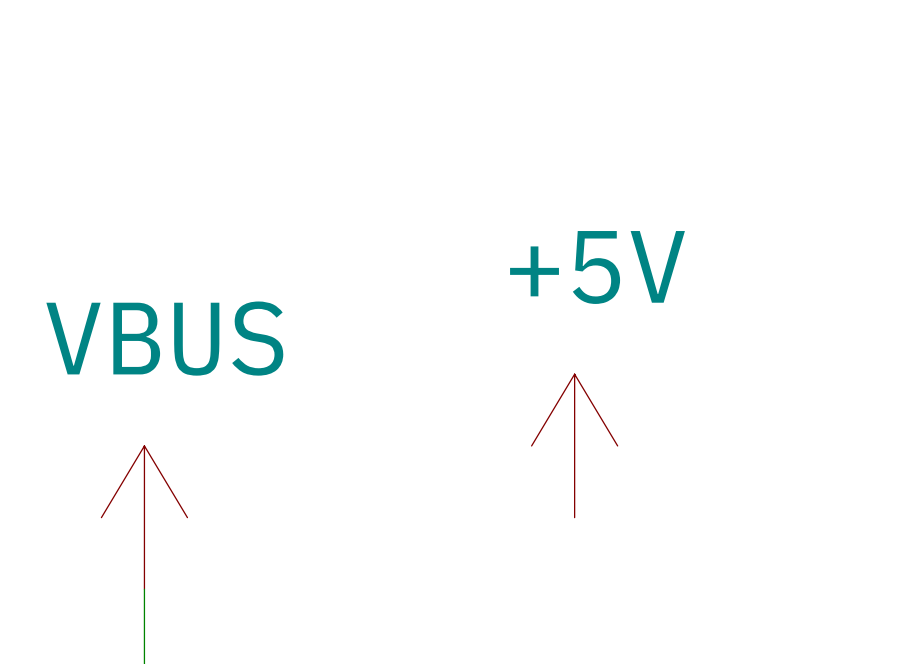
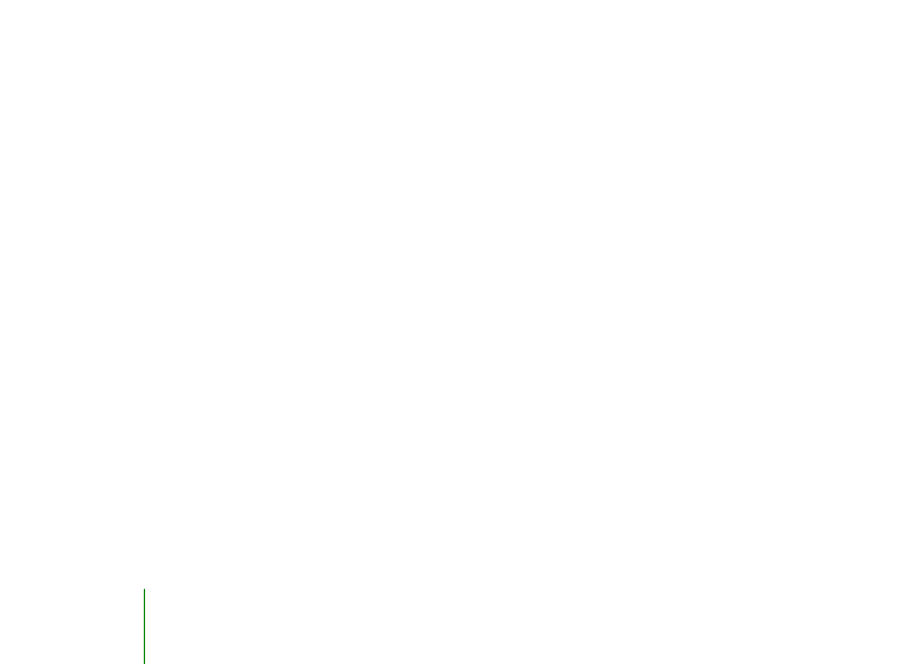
power symbol: +5V (574, 445) -> none
power symbol: VBUS (144, 517) -> none

